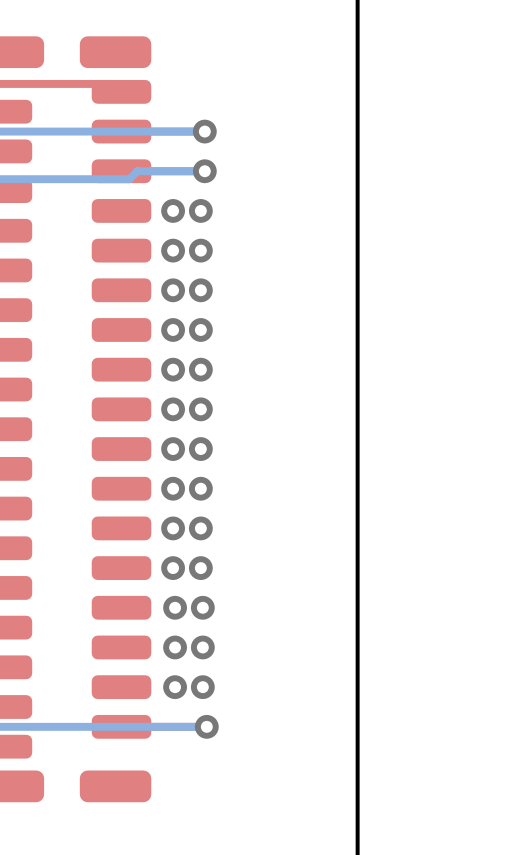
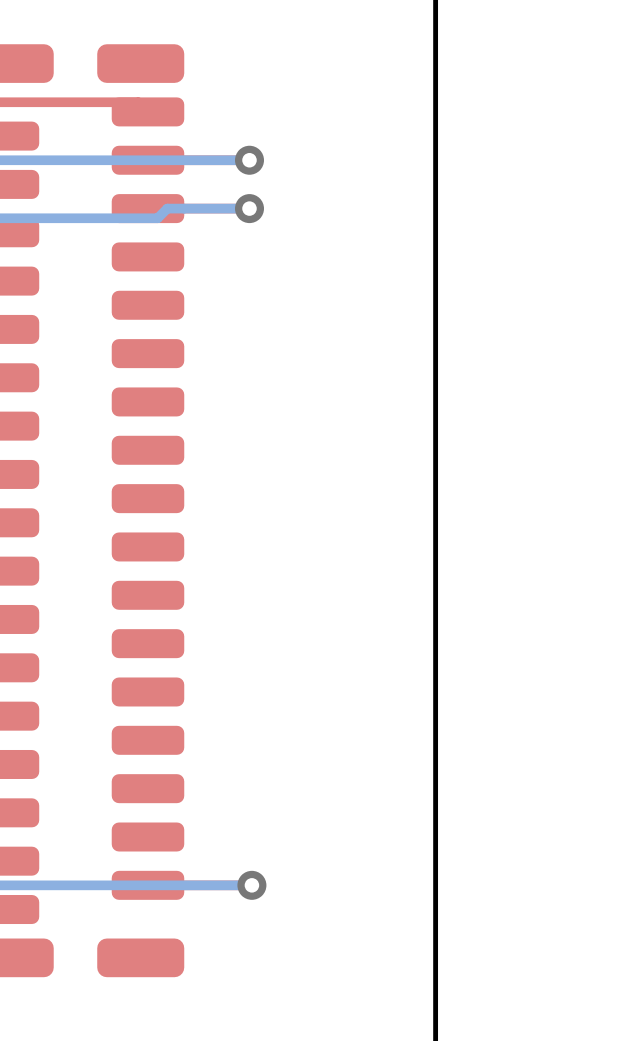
via: (173, 210) -> none
via: (200, 210) -> none
via: (173, 250) -> none
via: (200, 250) -> none
via: (173, 290) -> none
via: (200, 290) -> none
via: (173, 329) -> none
via: (200, 329) -> none
via: (173, 369) -> none
via: (200, 369) -> none
via: (173, 409) -> none
via: (200, 409) -> none
via: (173, 449) -> none
via: (200, 449) -> none
via: (173, 488) -> none
via: (200, 488) -> none
via: (173, 528) -> none
via: (200, 528) -> none
via: (173, 568) -> none
via: (200, 568) -> none
via: (175, 607) -> none
via: (202, 607) -> none
via: (175, 647) -> none
via: (202, 647) -> none
via: (175, 687) -> none
via: (202, 687) -> none

